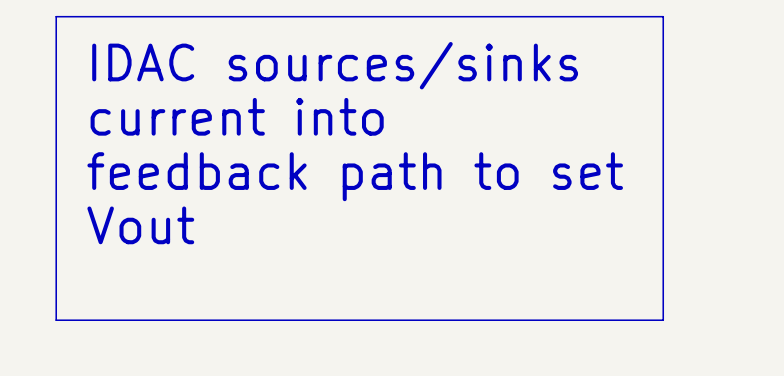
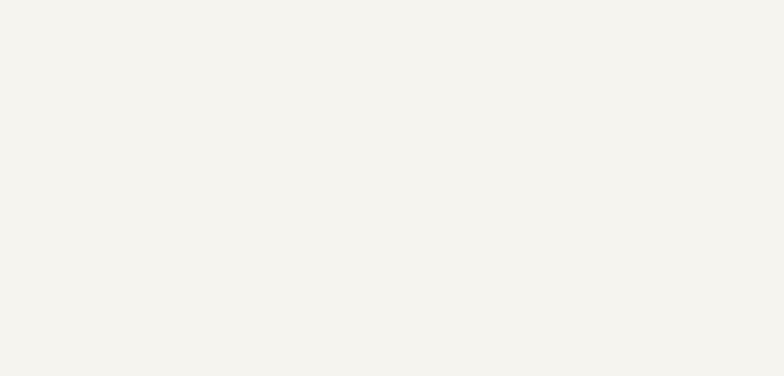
line: (56, 16) (663, 16) (663, 320) (56, 320) (56, 16) -> none
text: IDAC sources/sinks (335, 65) -> none
text: current into (237, 116) -> none
text: feedback path to set (355, 176) -> none
text: Vout (140, 225) -> none

